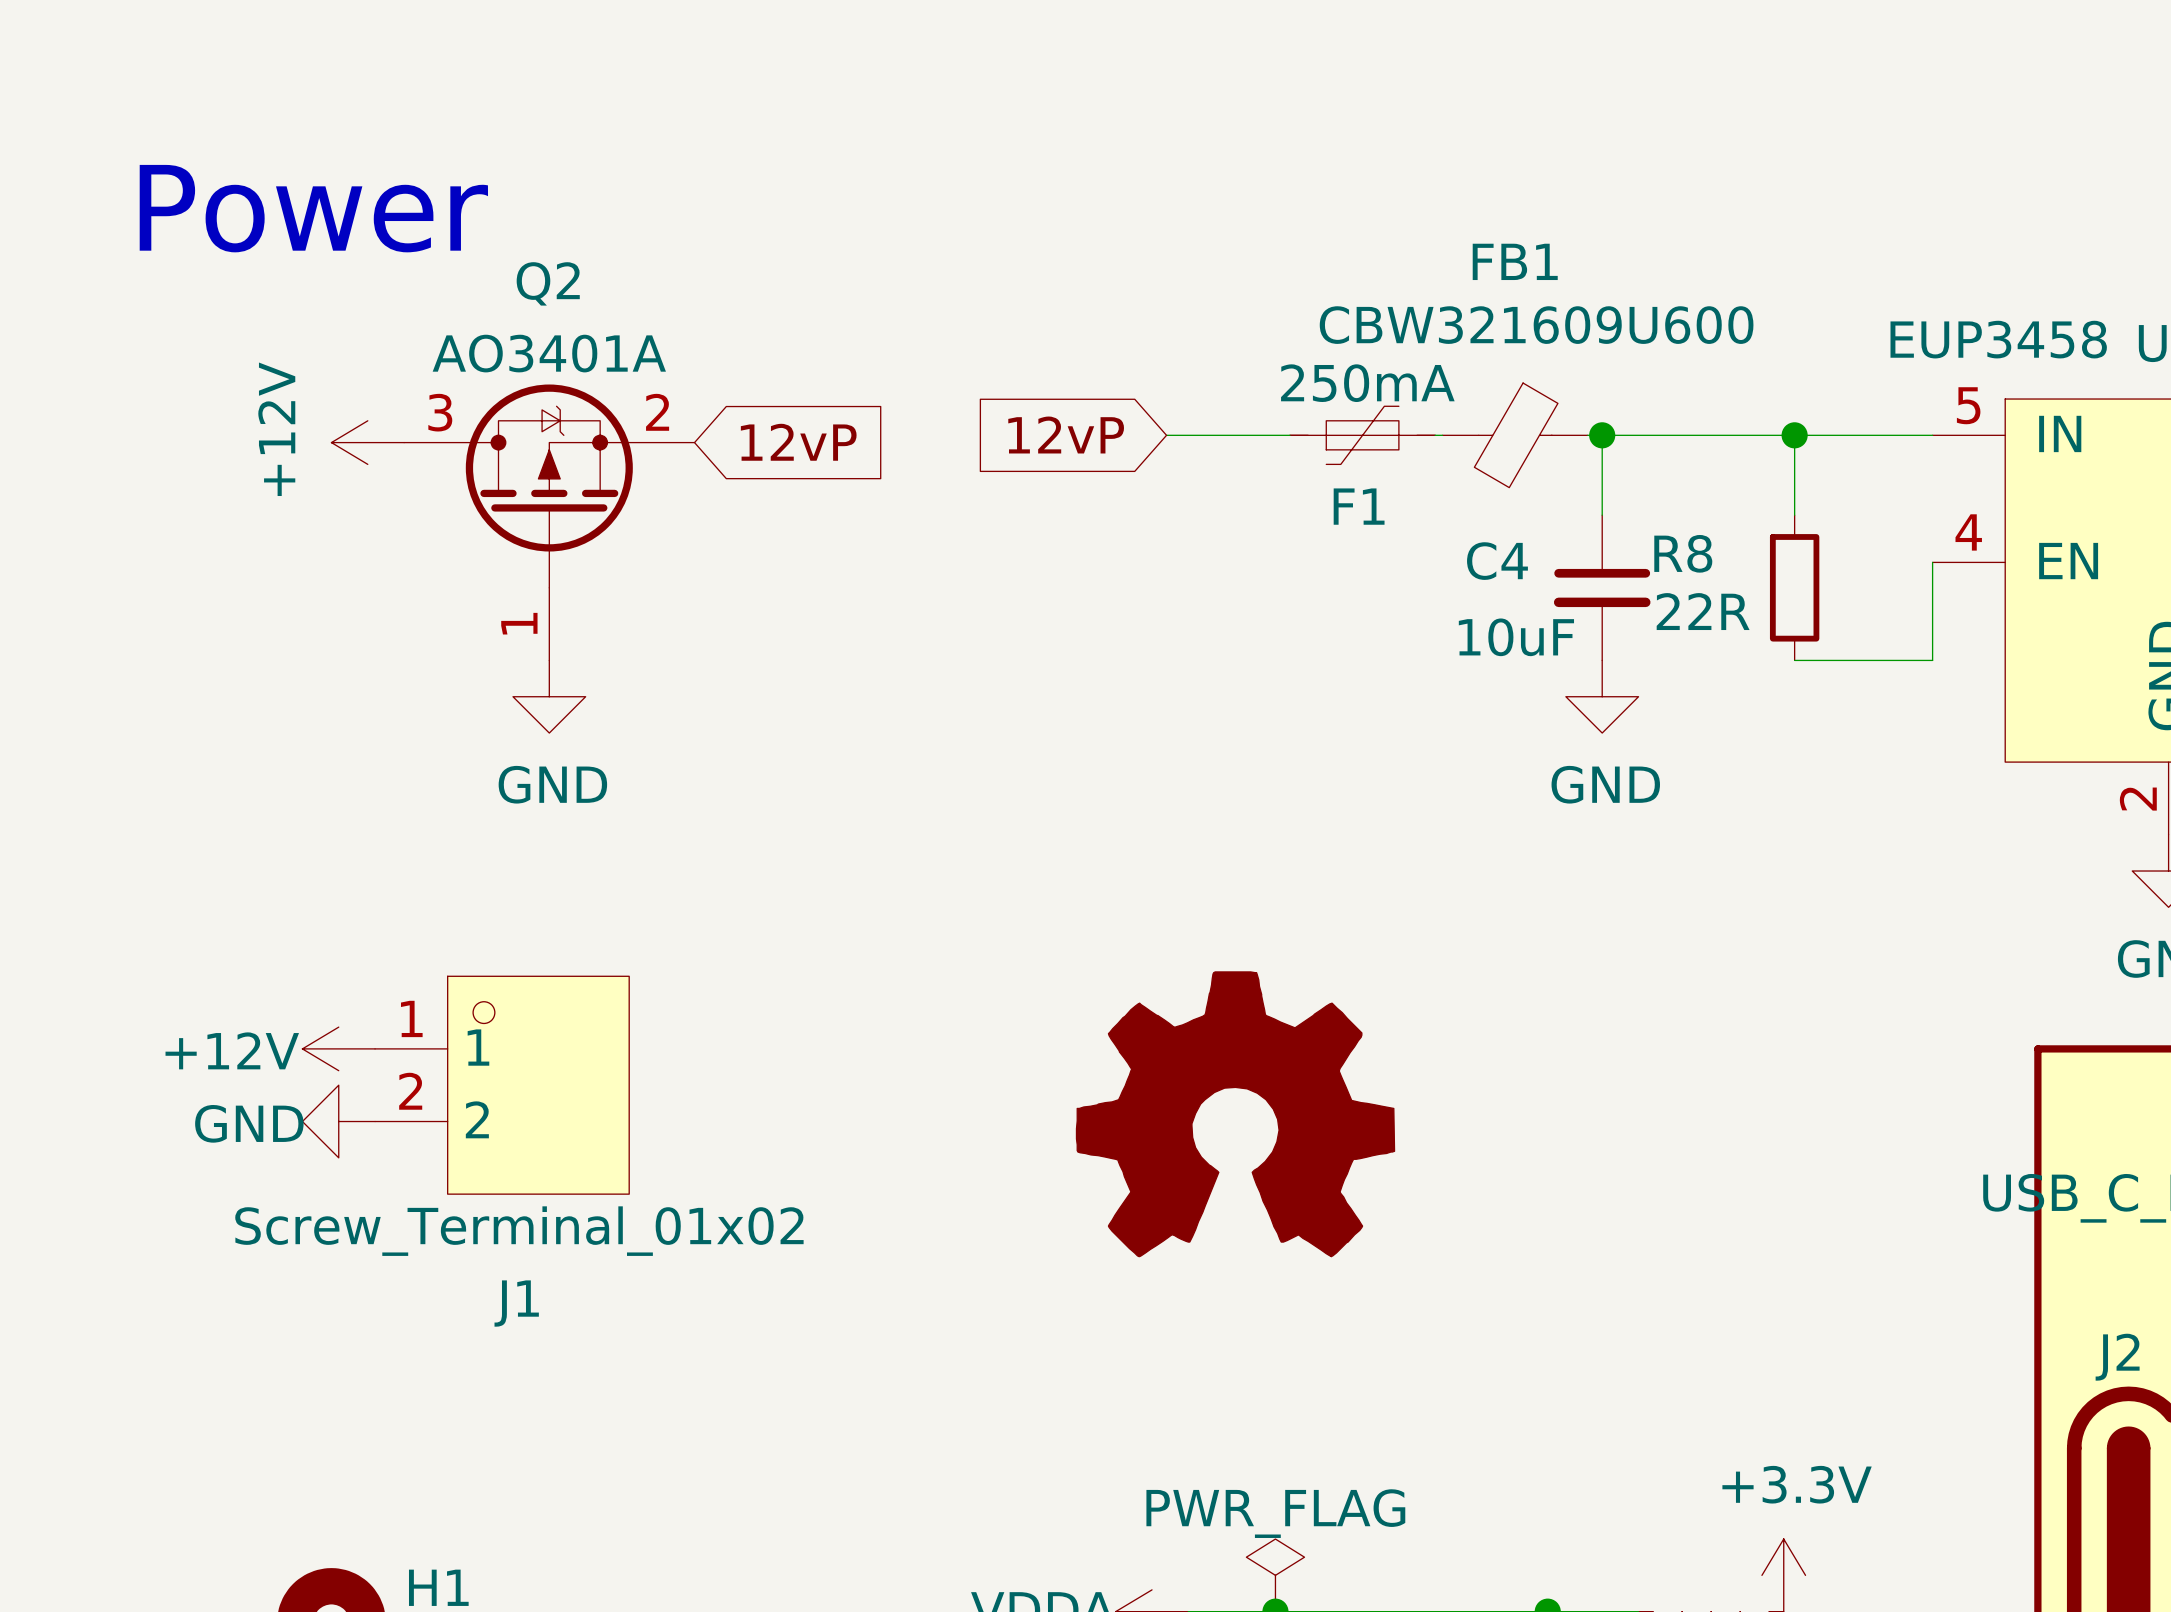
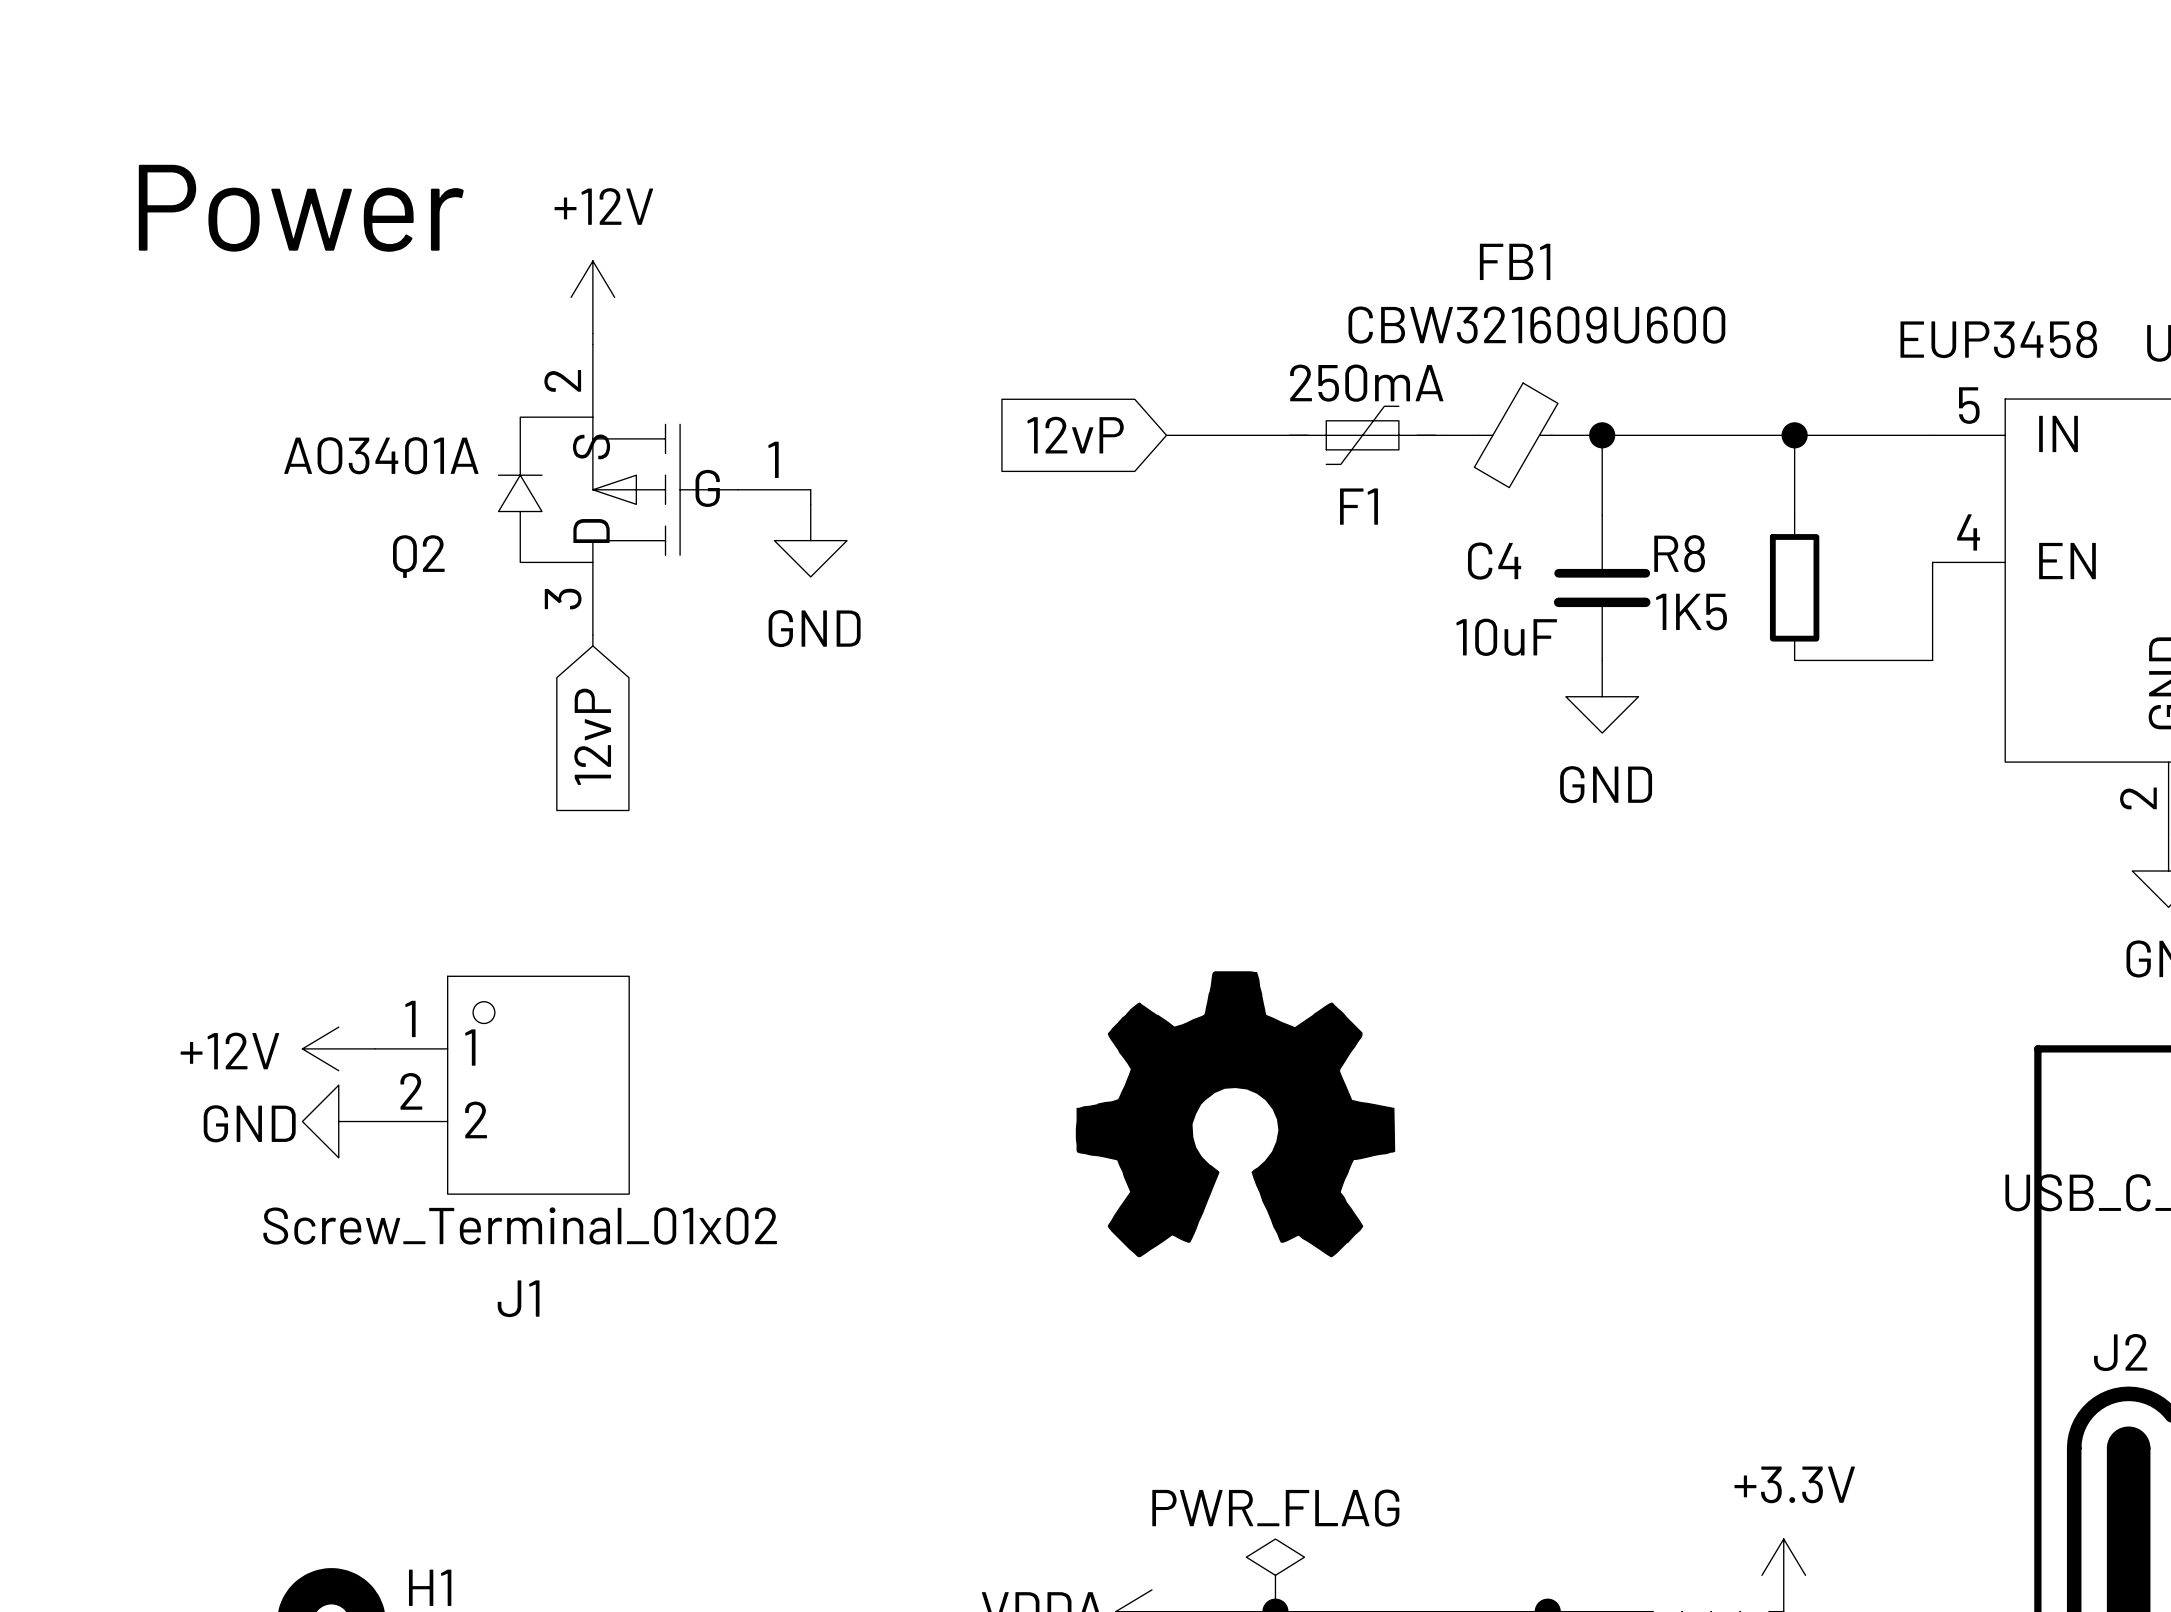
Q2 name position: Q2 (548, 283) -> Q2 (418, 556)
wire: none -> (592, 333) (592, 344)
Q2 value position: AO3401A (549, 353) -> AO3401A (381, 455)
Q2 symbol: [404, 384, 695, 661] -> [498, 344, 811, 636]
power symbol rotation: 0° (367, 442) -> 90° clockwise (592, 297)
power symbol position: +12V (367, 442) -> +12V (592, 297)
global label rotation: 0° (798, 442) -> 90° clockwise (592, 736)
global label position: 12vP (798, 442) -> 12vP (592, 736)
wire: none -> (810, 489) (810, 504)
R8 value: 22R (1703, 611) -> 1K5 (1691, 612)
wire: none -> (592, 635) (592, 645)
power symbol position: GND (549, 696) -> GND (810, 540)

